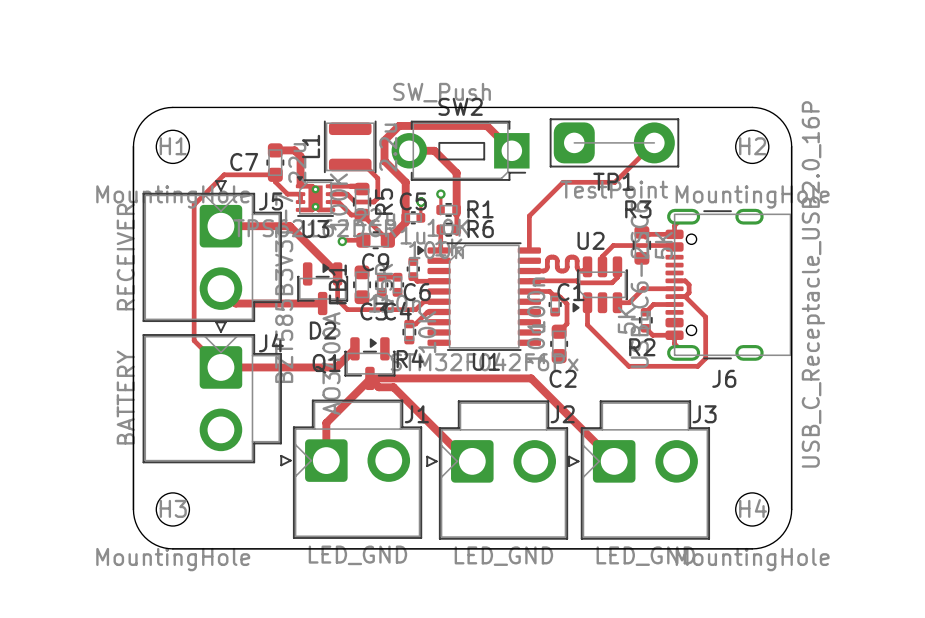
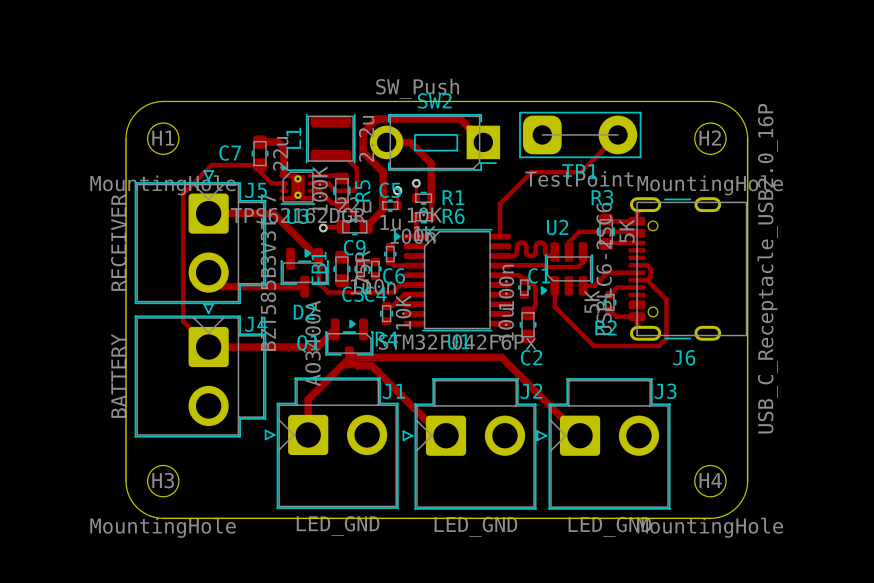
track: none -> (637, 242) (606, 244)

